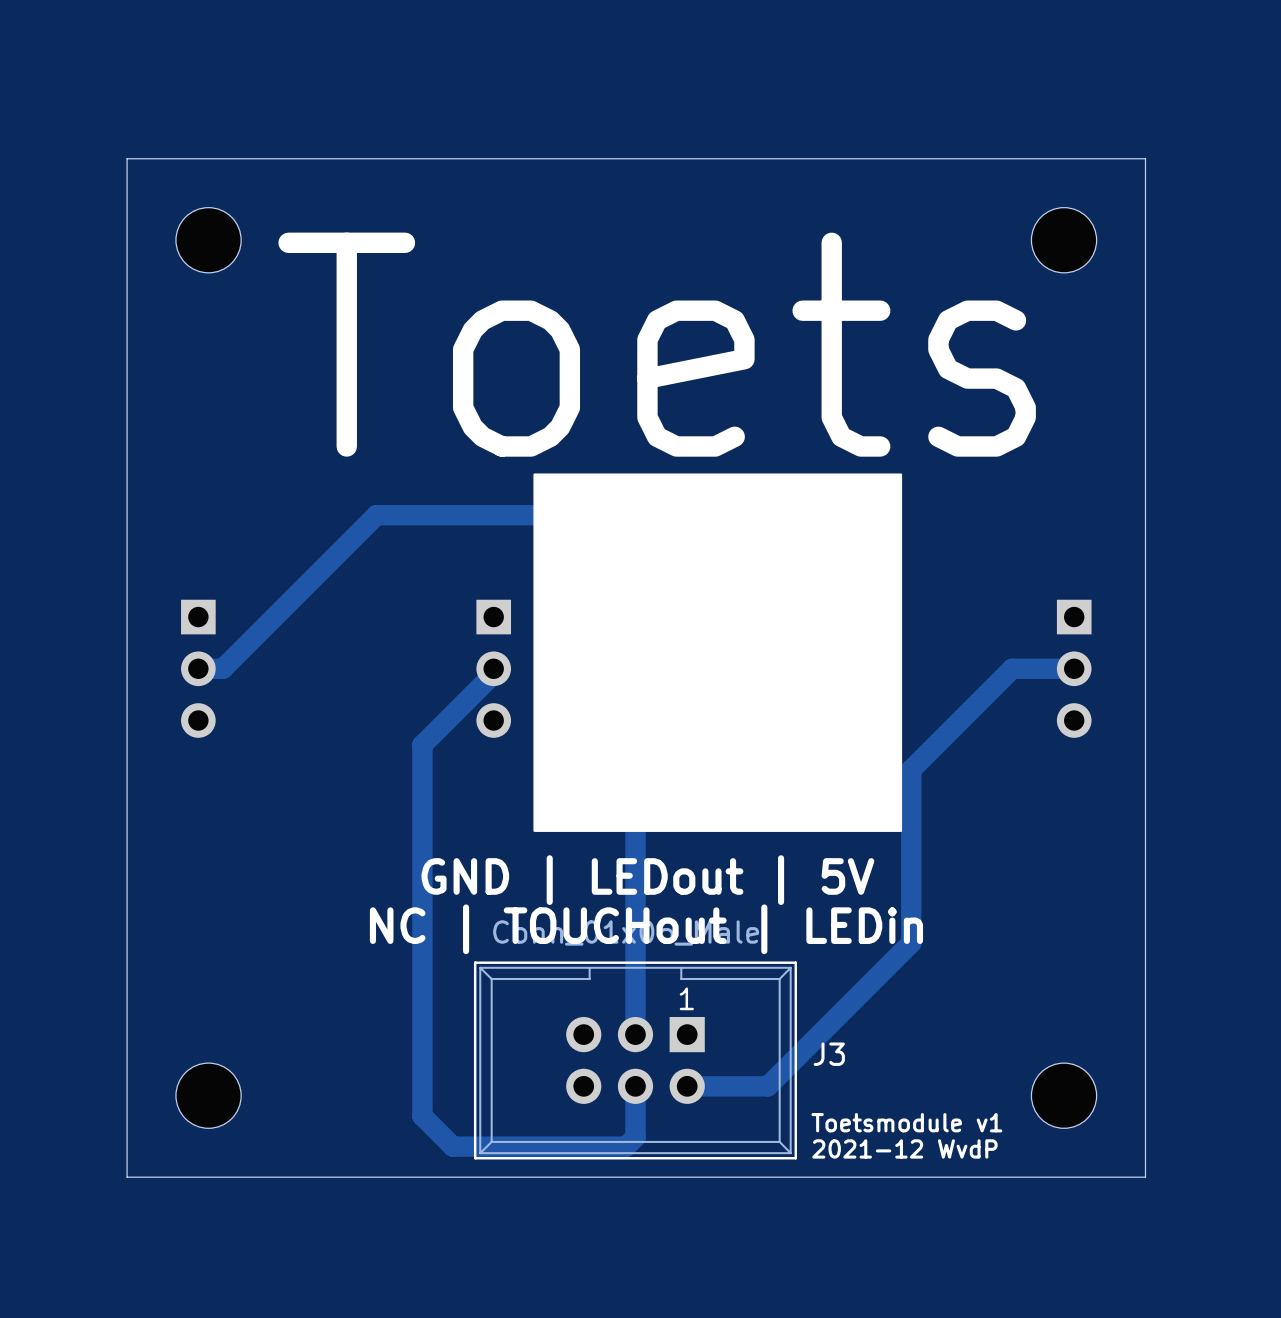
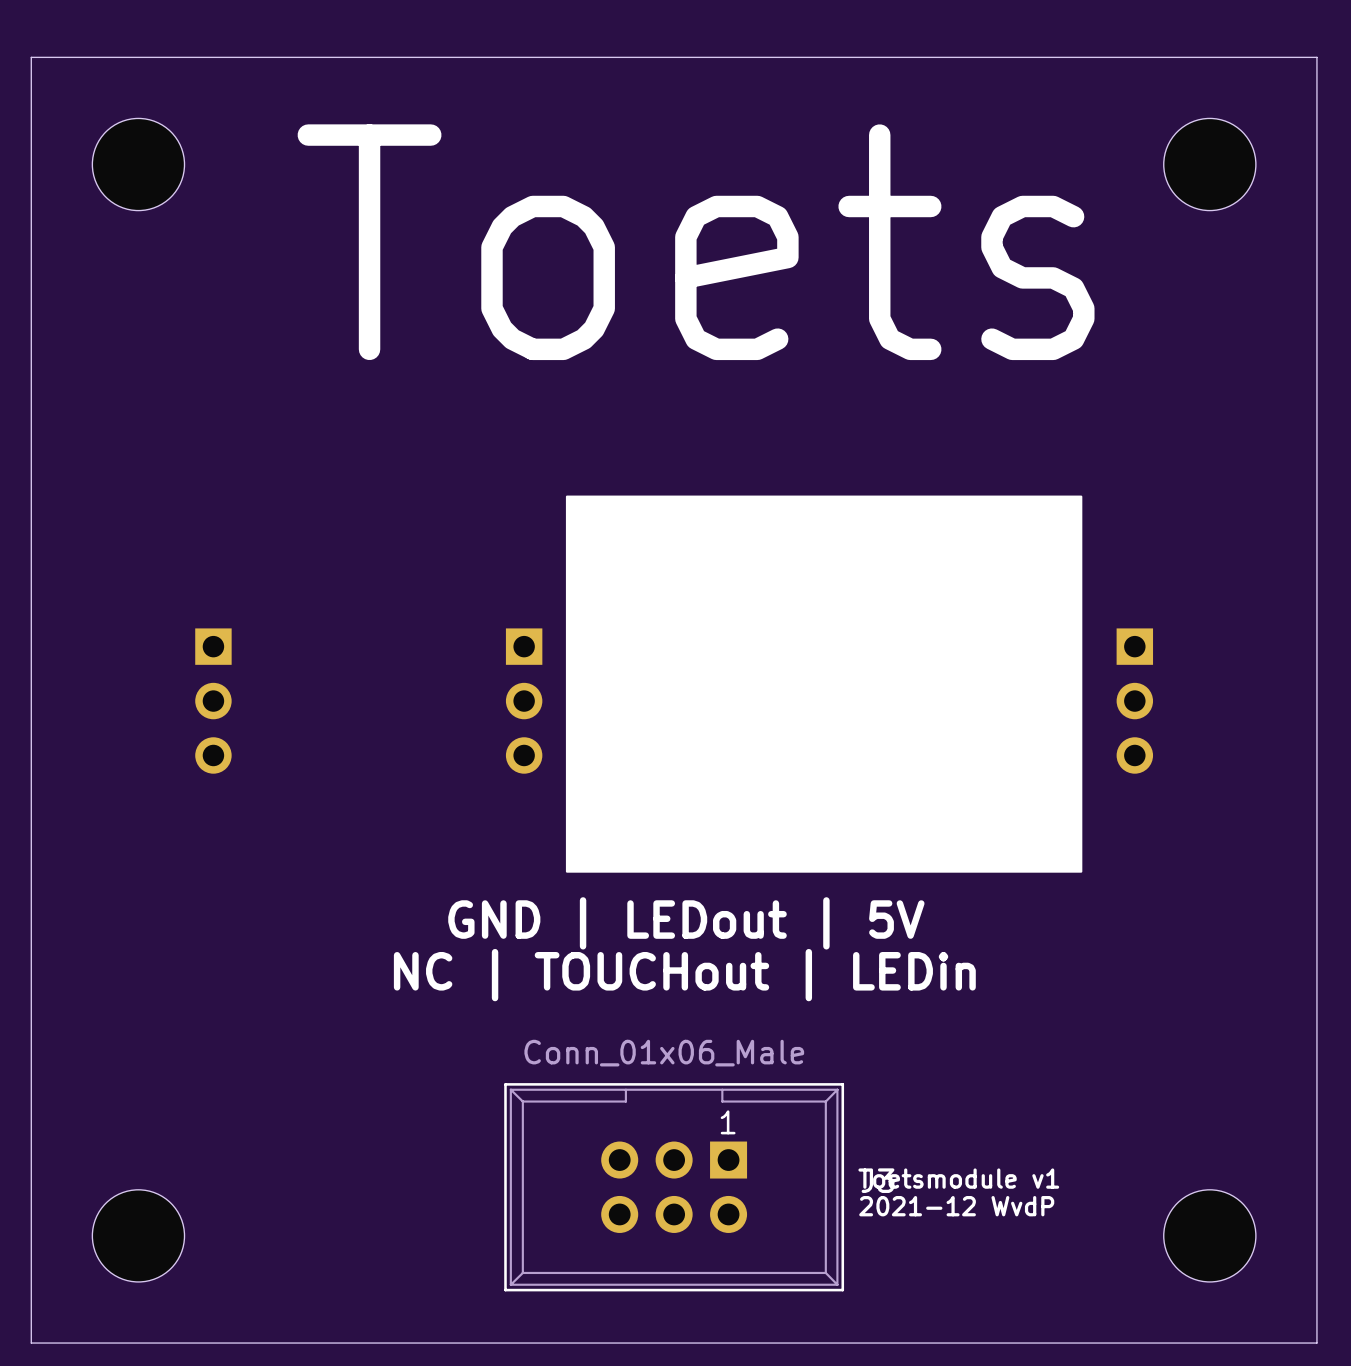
part: none -> (138, 164)
board edge: (1145, 158) (1145, 1177) (127, 1177) (127, 158) (1145, 158) -> (1316, 57) (1316, 1343) (31, 1343) (31, 57) (1316, 57)
part: none -> (1209, 164)
part: (208, 240) -> none
part: (1064, 240) -> none
text position: Toets (657, 344) -> Toets (696, 242)
drawing: [533, 473, 903, 832] -> none
drawing: none -> [565, 495, 1083, 873]
track: (198, 668) (222, 668) (376, 515) (544, 515) (635, 606) (635, 1034) -> none
track: (493, 668) (493, 673) (422, 745) (422, 1116) (452, 1146) (626, 1146) (635, 1137) (635, 1086) -> none
track: (1074, 668) (1012, 668) (911, 769) (911, 942) (767, 1086) (687, 1086) -> none
J3 position: (635, 1060) -> (674, 1187)
part: (208, 1095) -> none
part: (1064, 1095) -> none
part: none -> (138, 1235)
part: none -> (1209, 1235)

